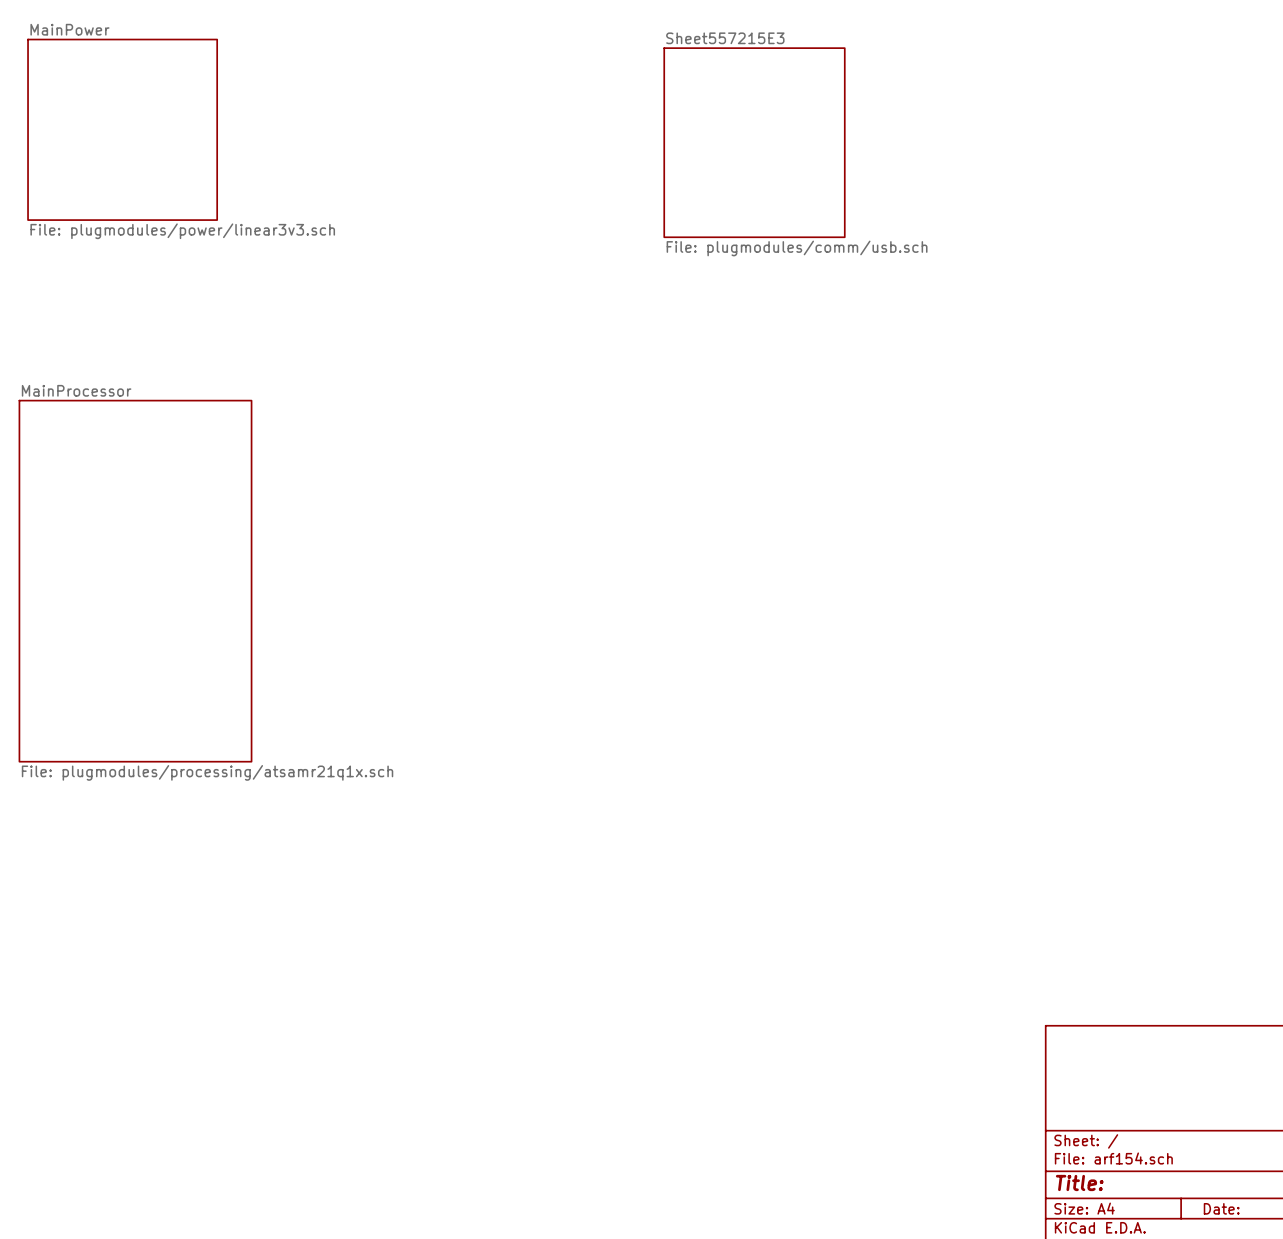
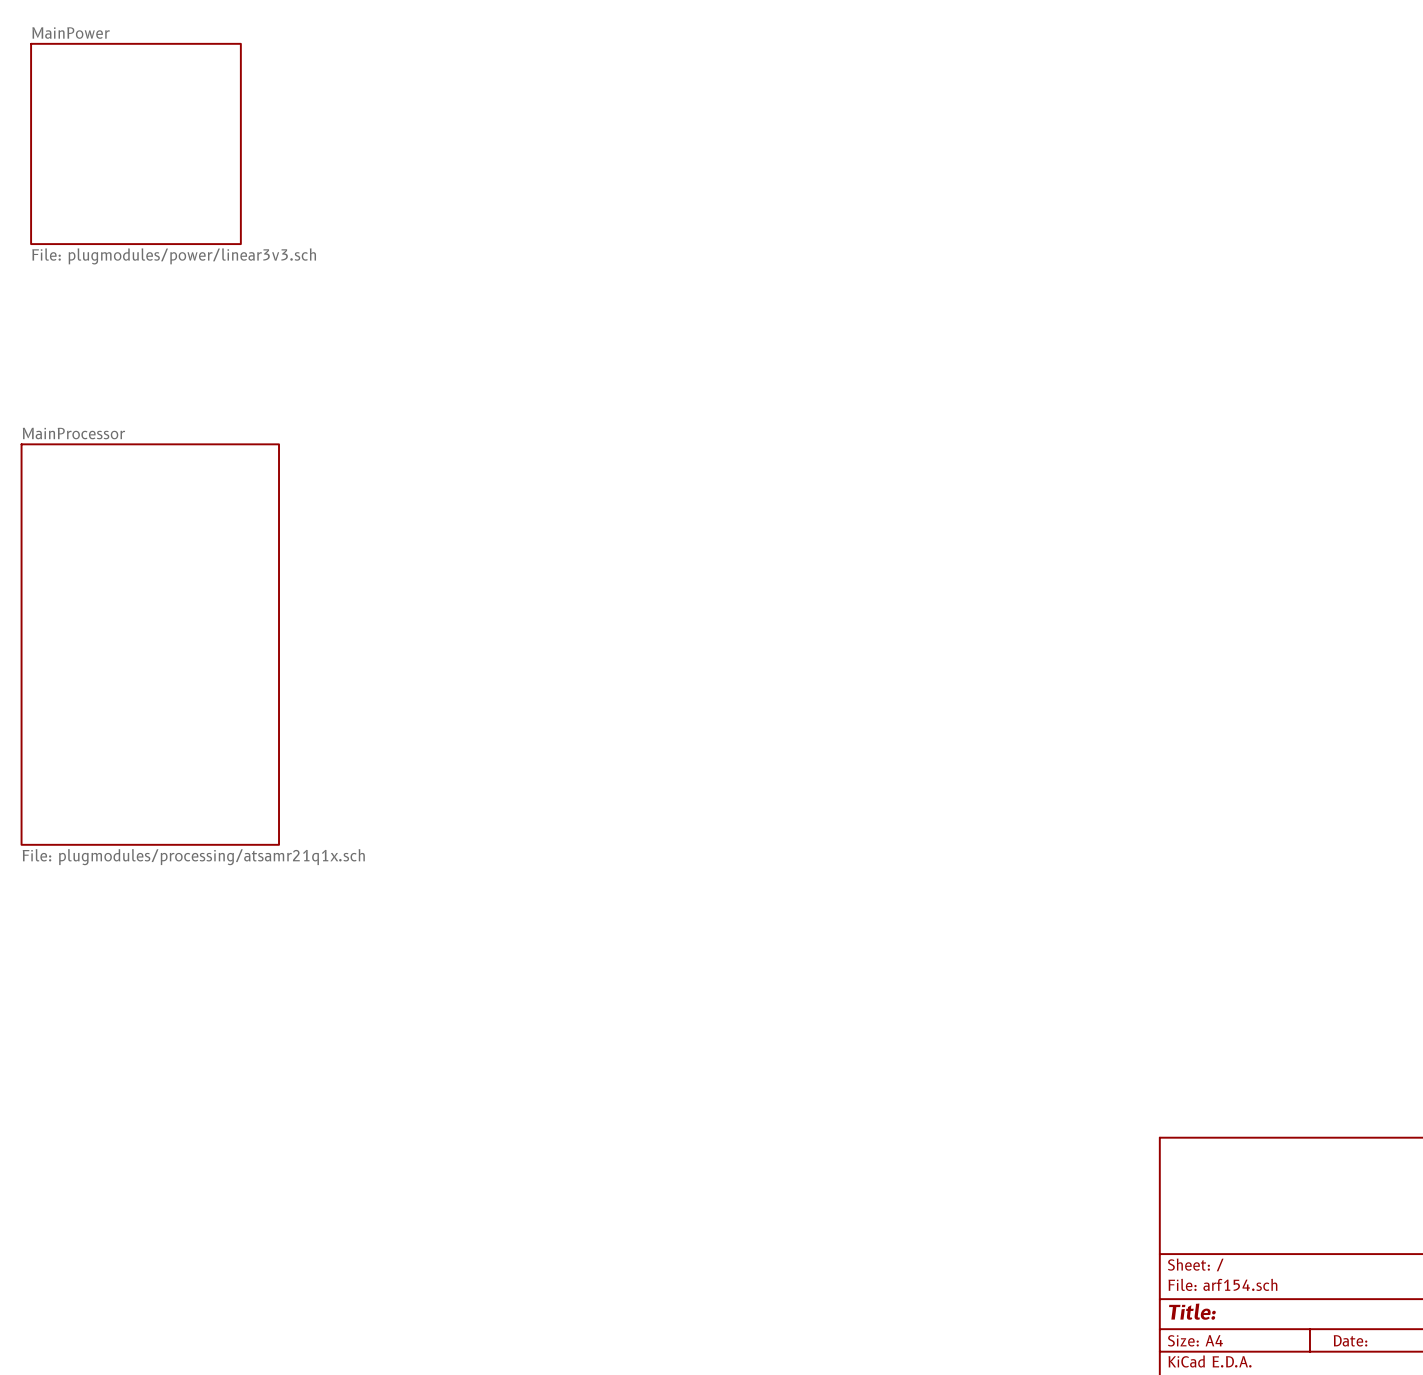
sheet Sheet557215E3: File: plugmodules/comm/usb.sch (754, 142) -> none

